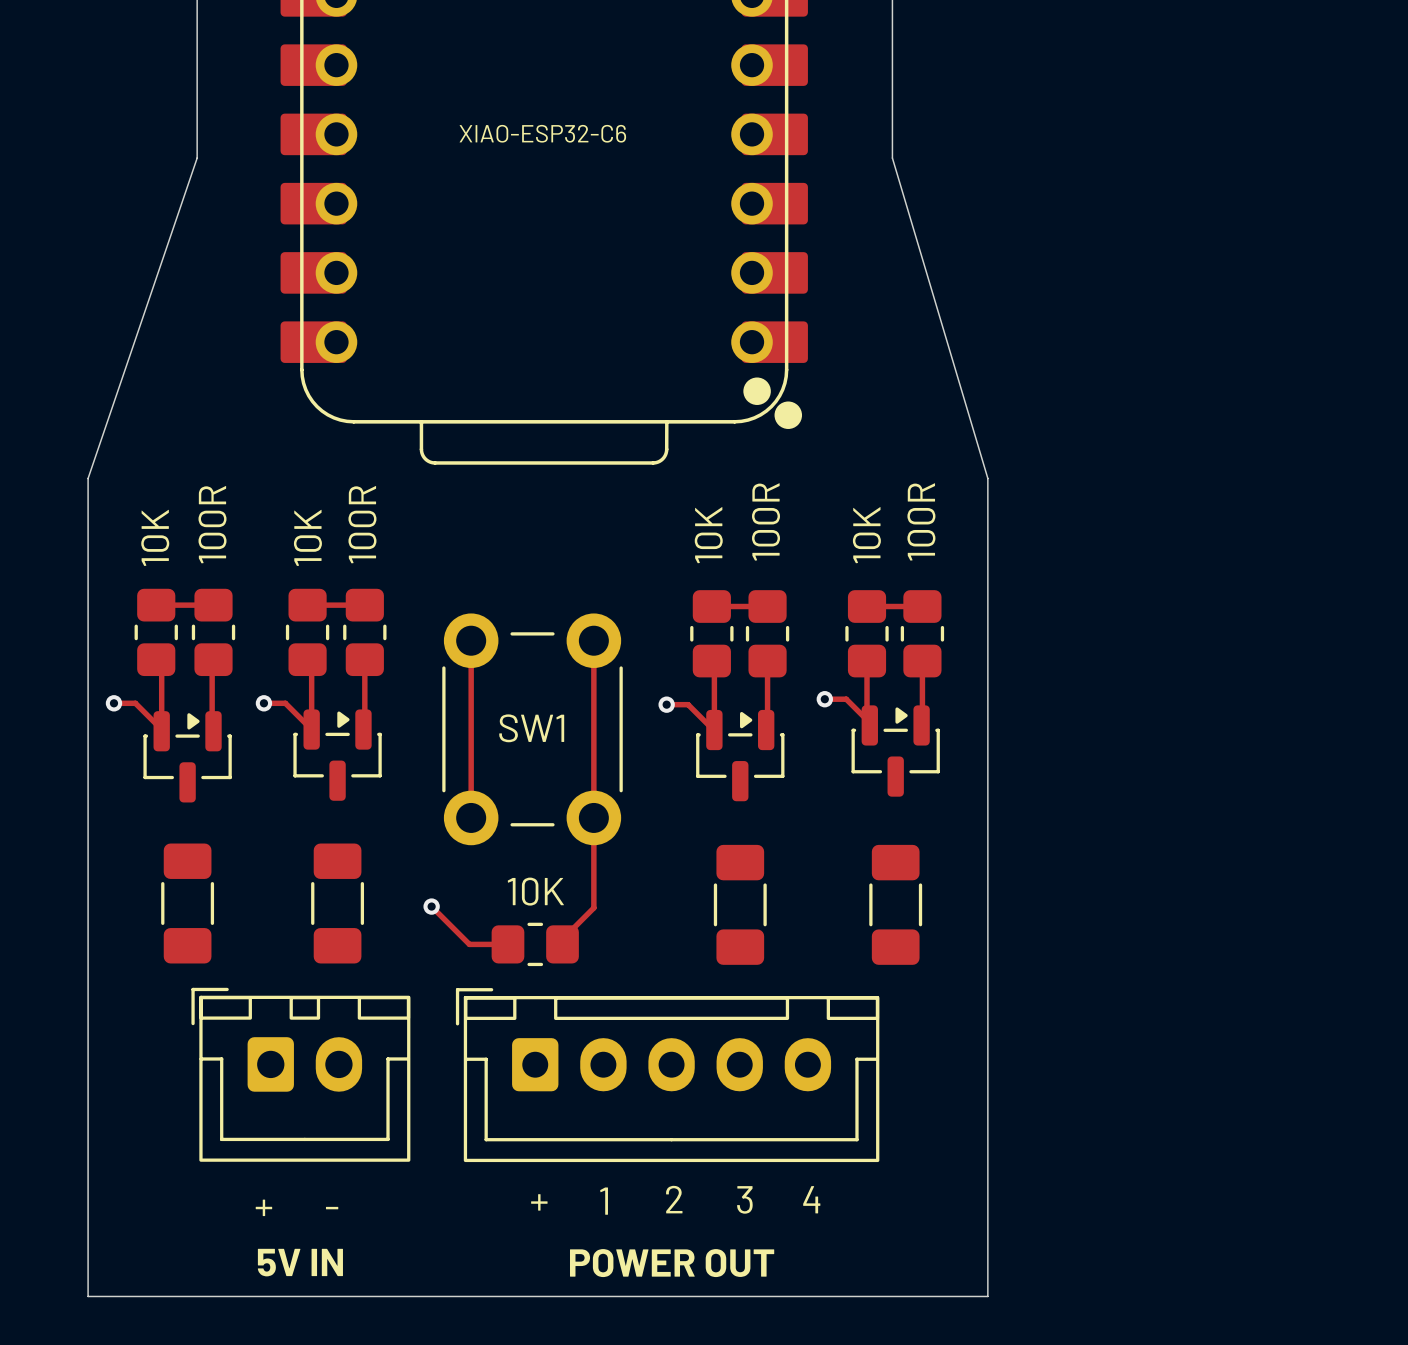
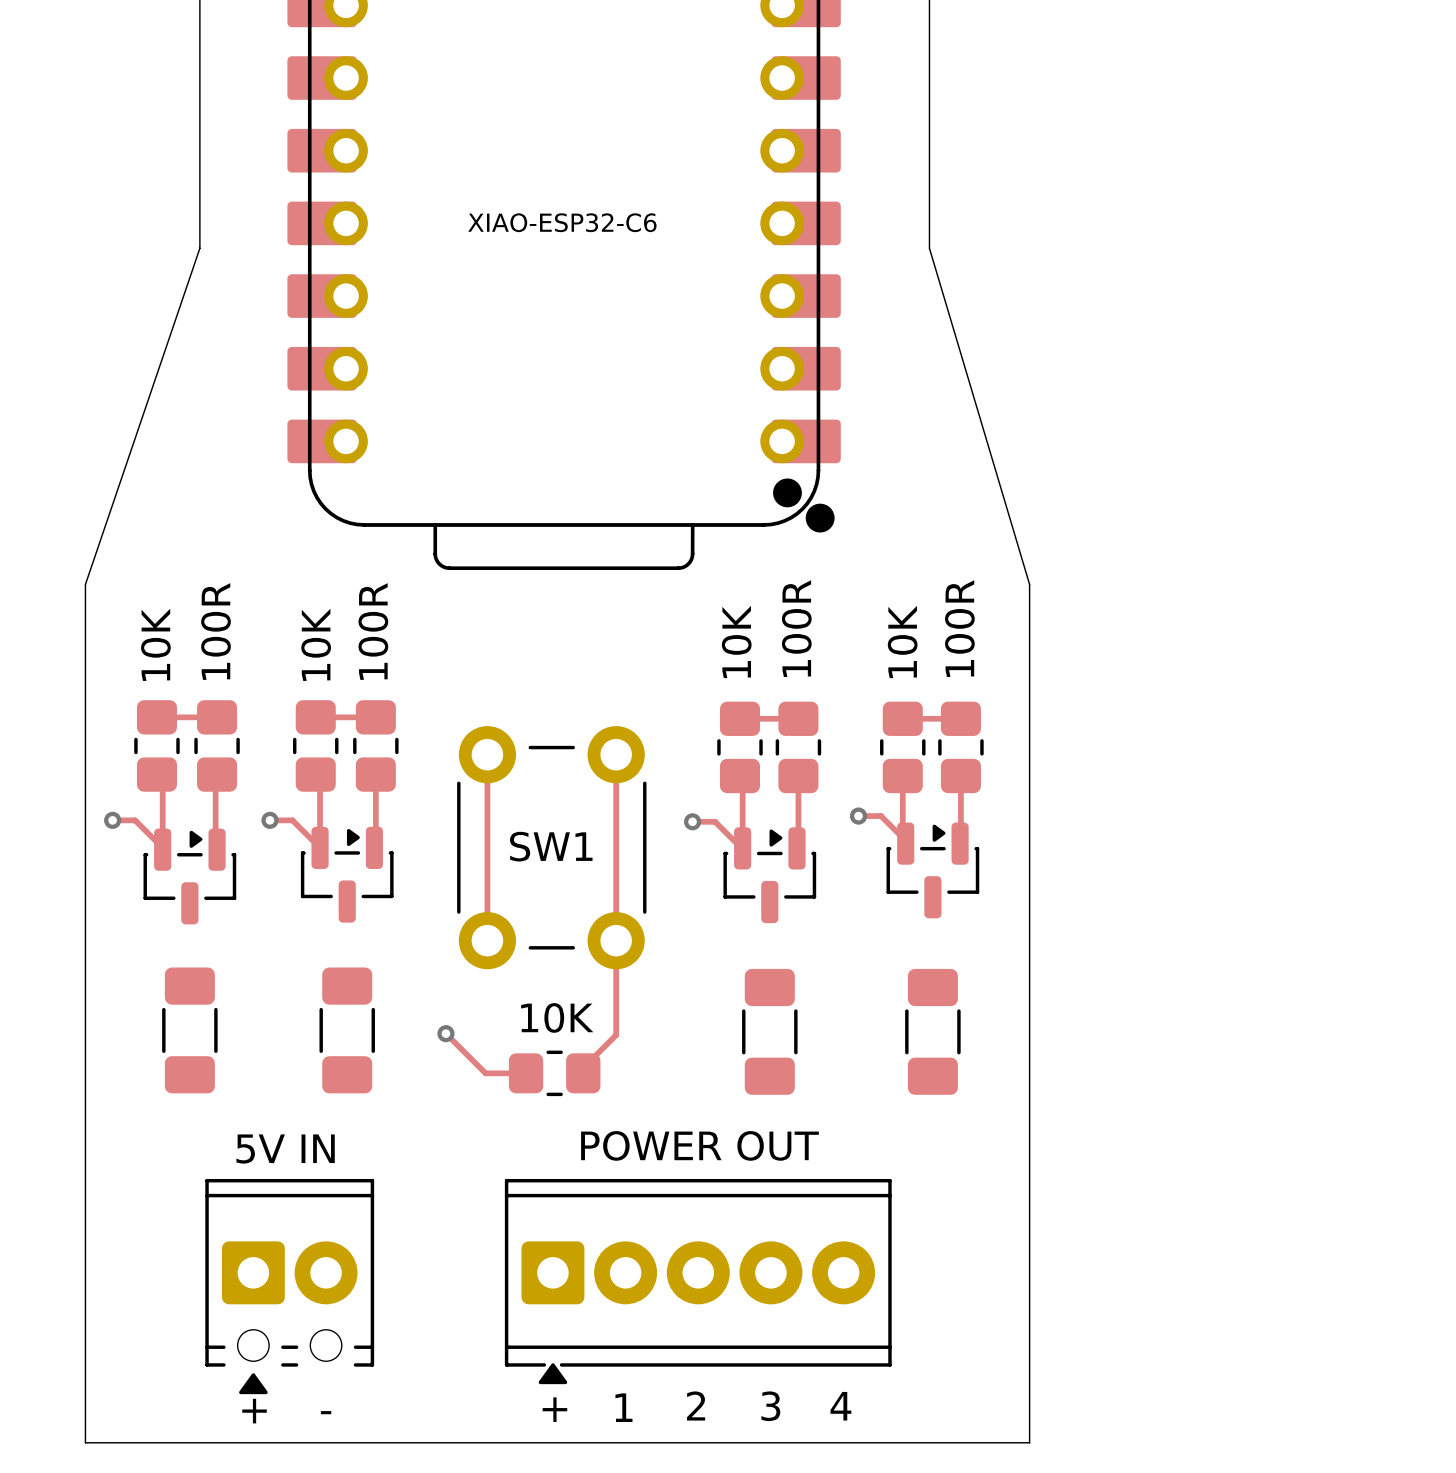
part: 5V IN (300, 1074) -> none
part: POWER OUT (667, 1075) -> none
part: none -> POWER OUT (698, 1281)
part: none -> 5V IN (289, 1286)
text position: 2 (674, 1199) -> 2 (696, 1405)
text position: 3 (744, 1199) -> 3 (770, 1406)
text position: 4 (811, 1199) -> 4 (840, 1406)
text position: 1 (604, 1201) -> 1 (623, 1407)
text position: + (539, 1202) -> + (554, 1409)
text position: + (263, 1207) -> + (254, 1411)
text position: - (332, 1208) -> - (326, 1412)

